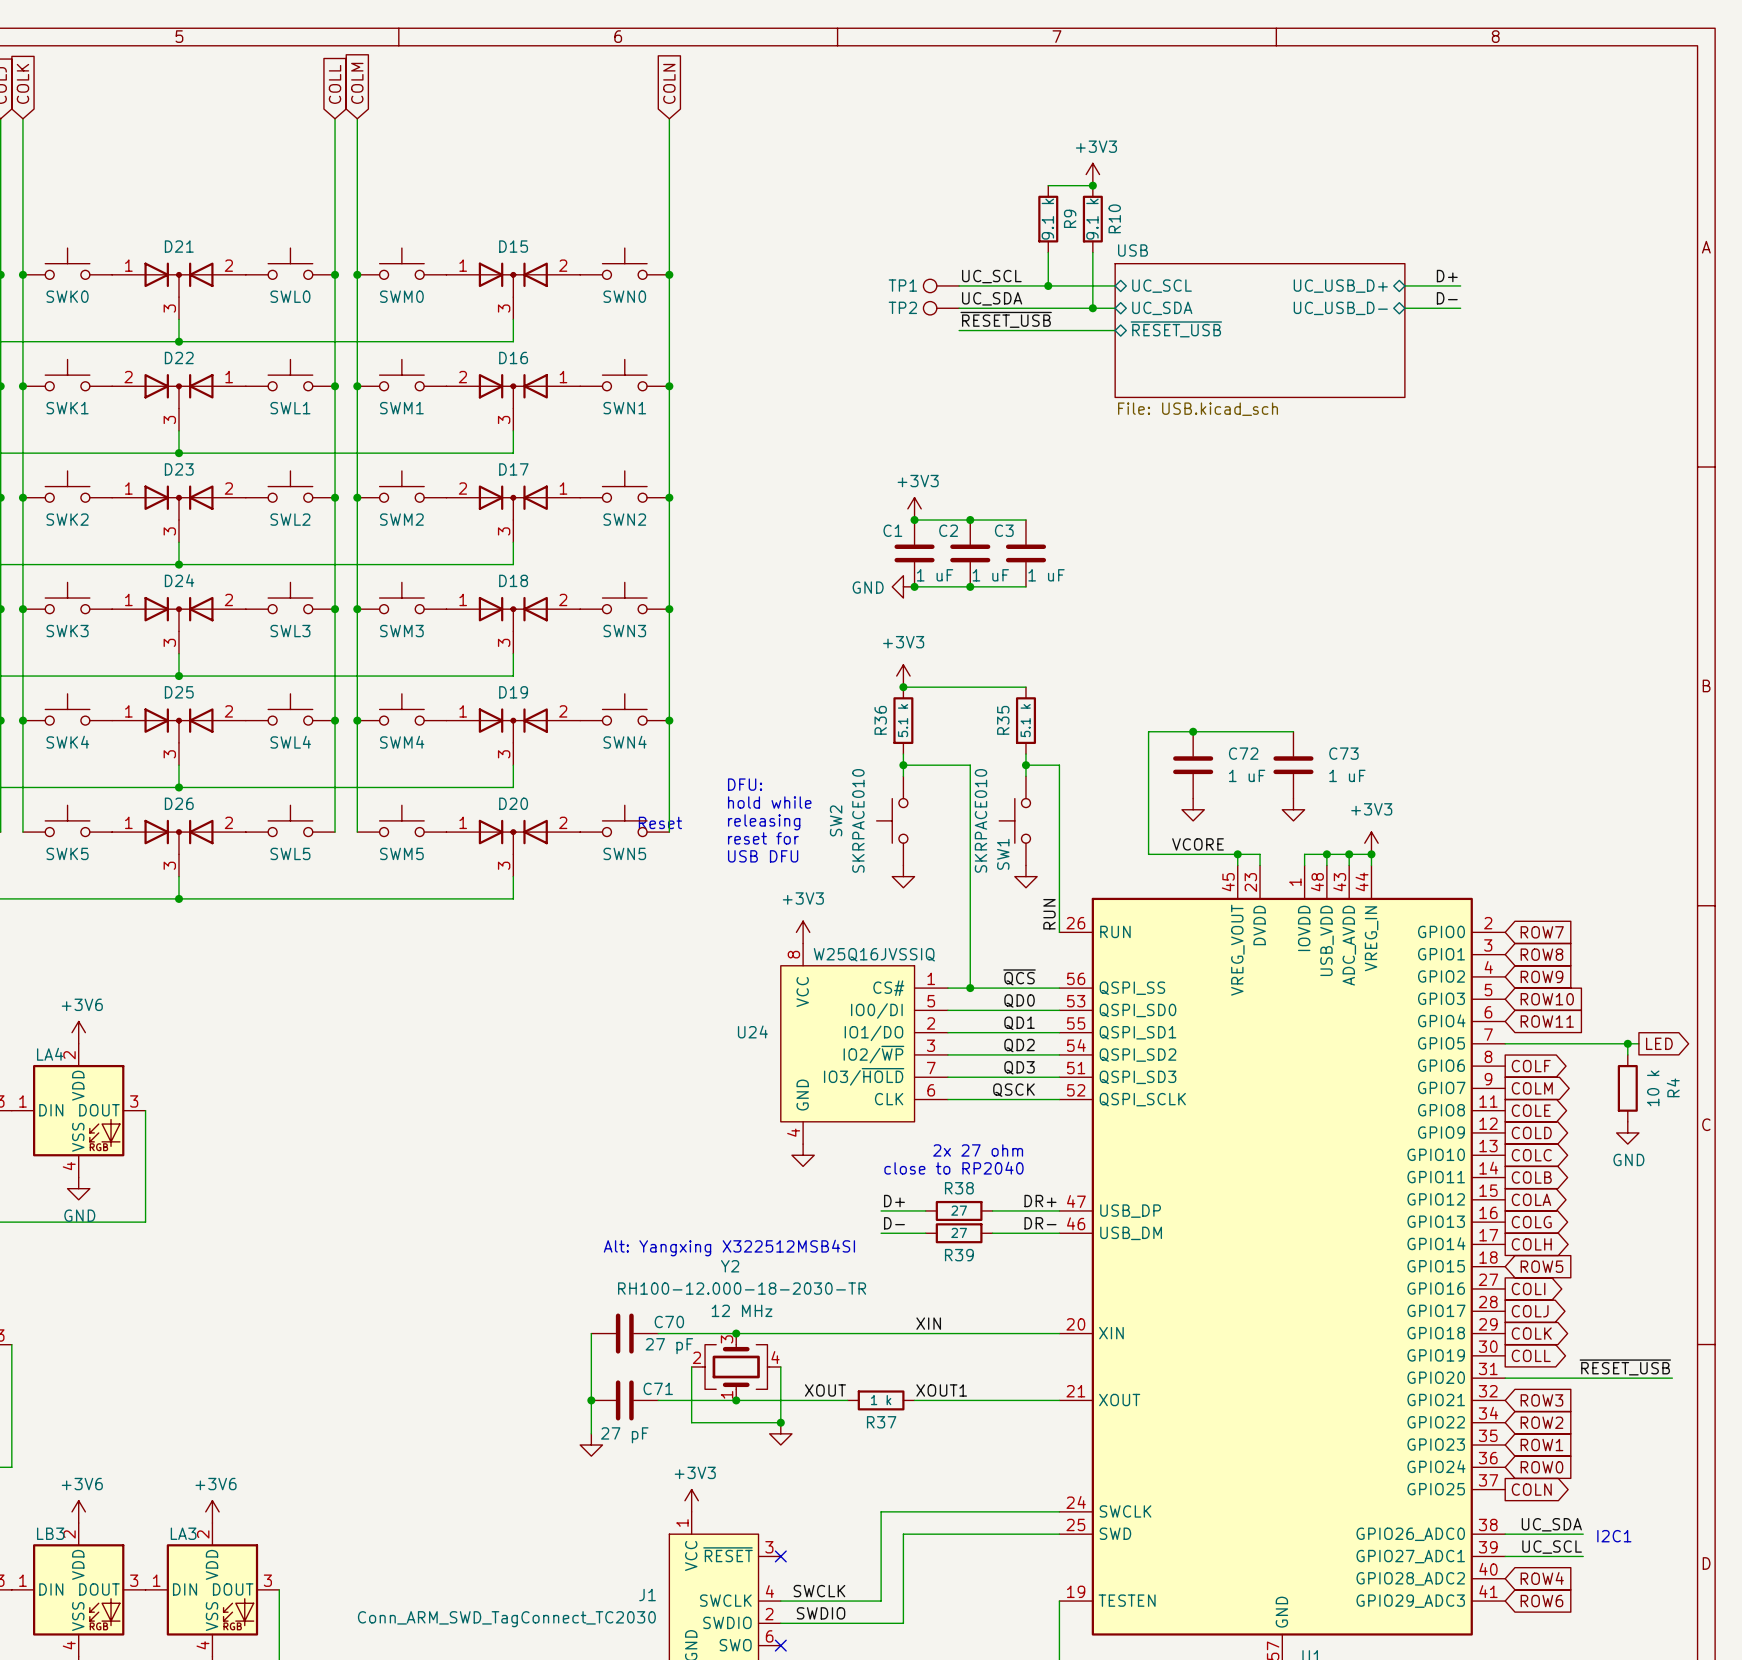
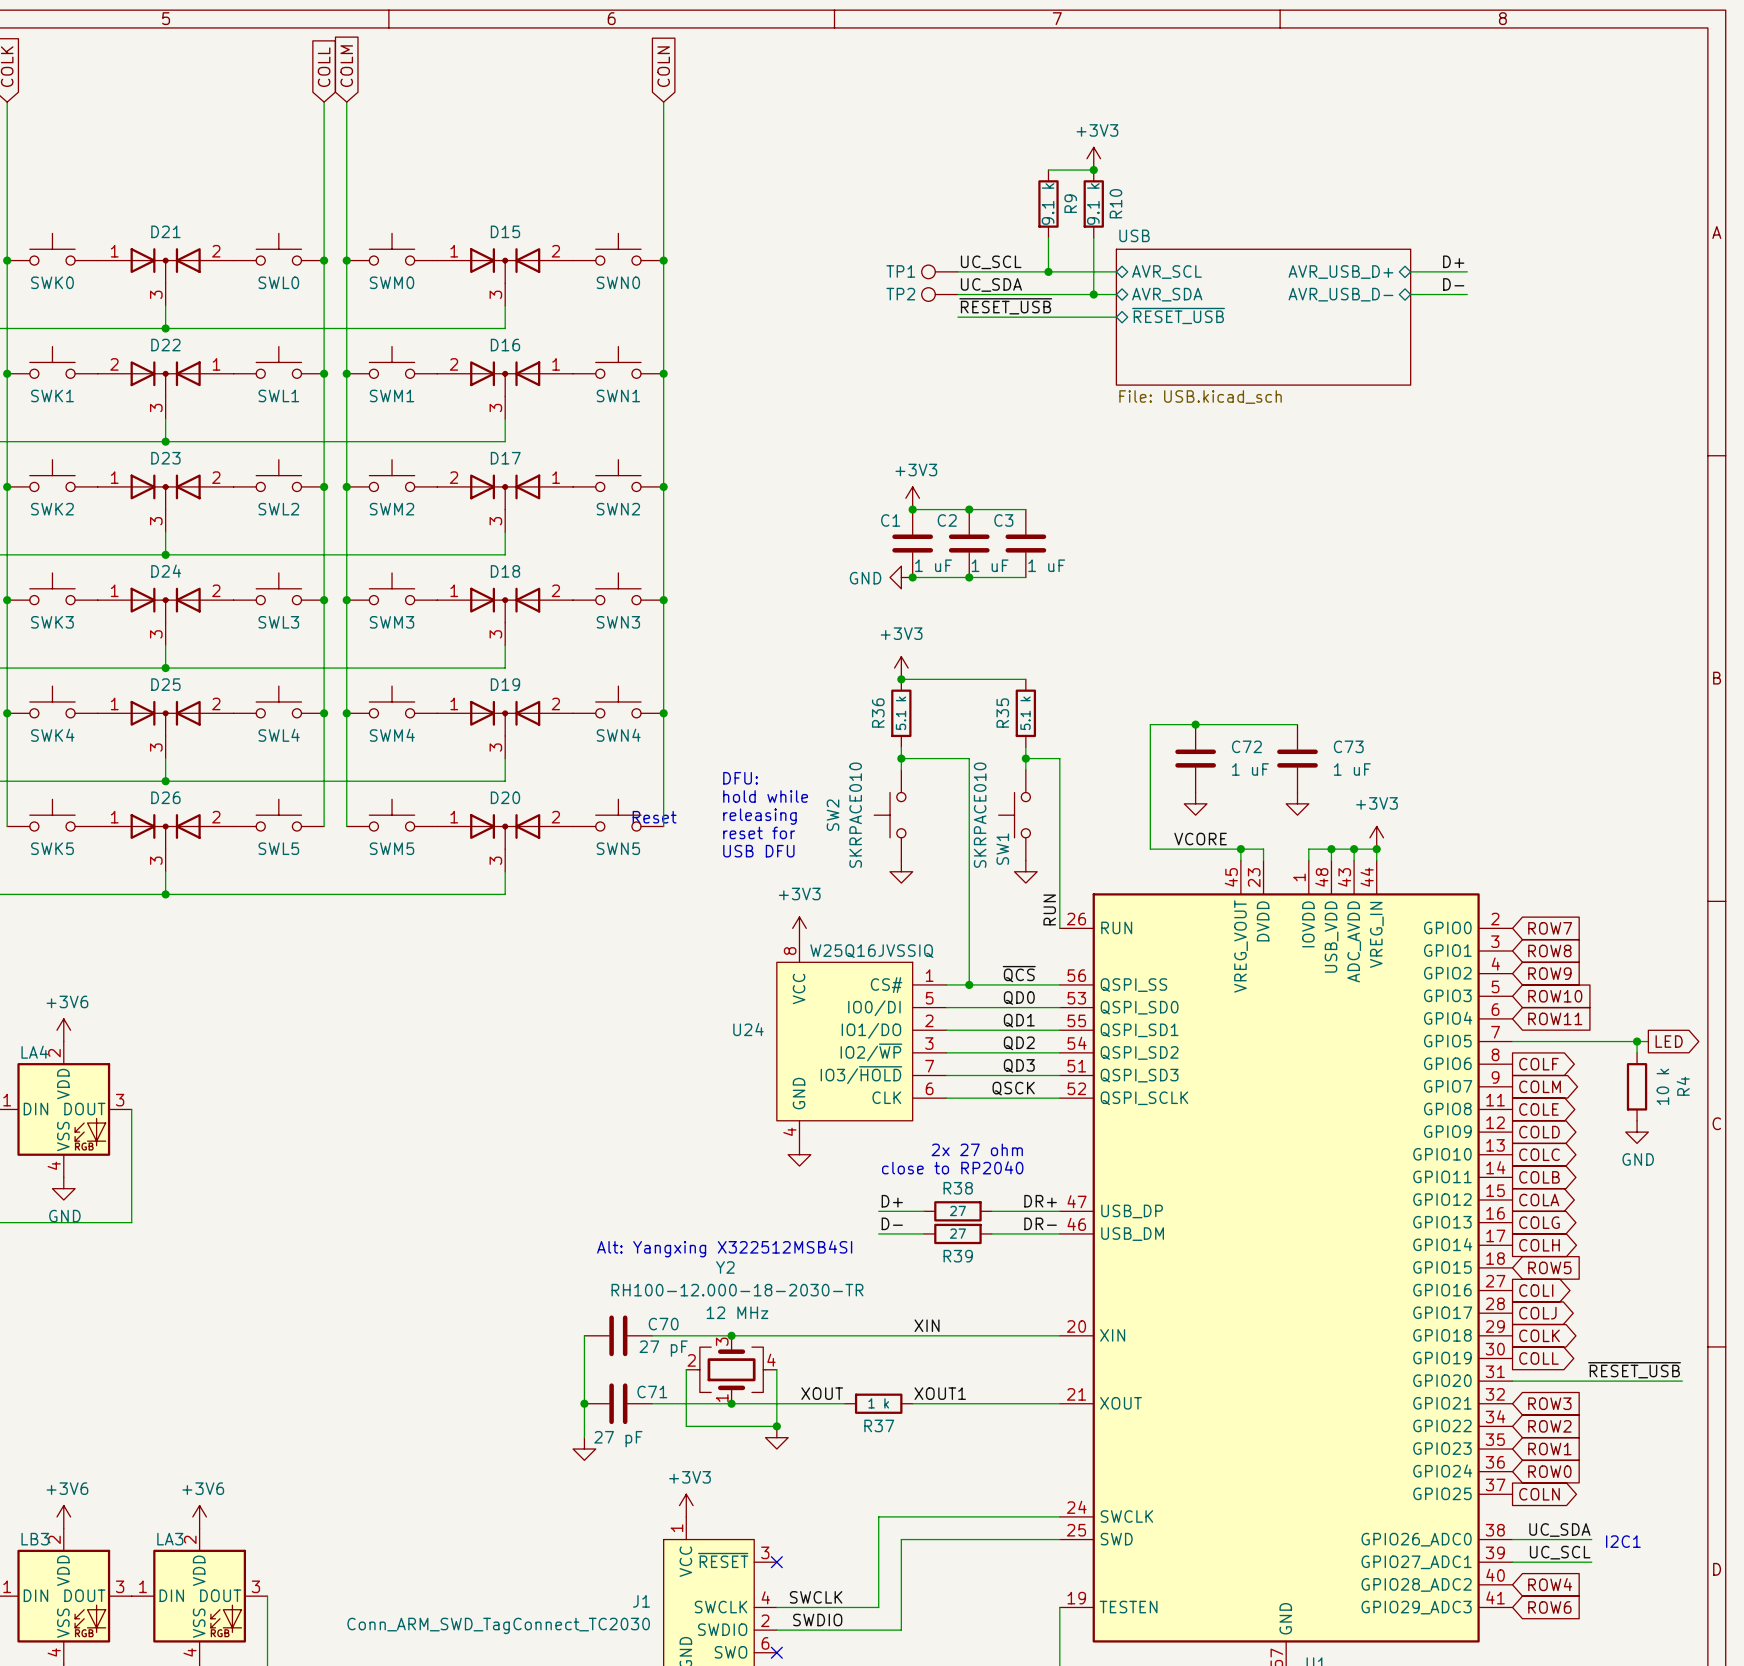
sheet pin: UC_SCL (1162, 286) -> AVR_SCL (1166, 272)
sheet pin: UC_USB_D+ (1340, 286) -> AVR_USB_D+ (1340, 272)
sheet pin: UC_SDA (1162, 308) -> AVR_SDA (1167, 294)
sheet pin: UC_USB_D- (1340, 308) -> AVR_USB_D- (1340, 294)

